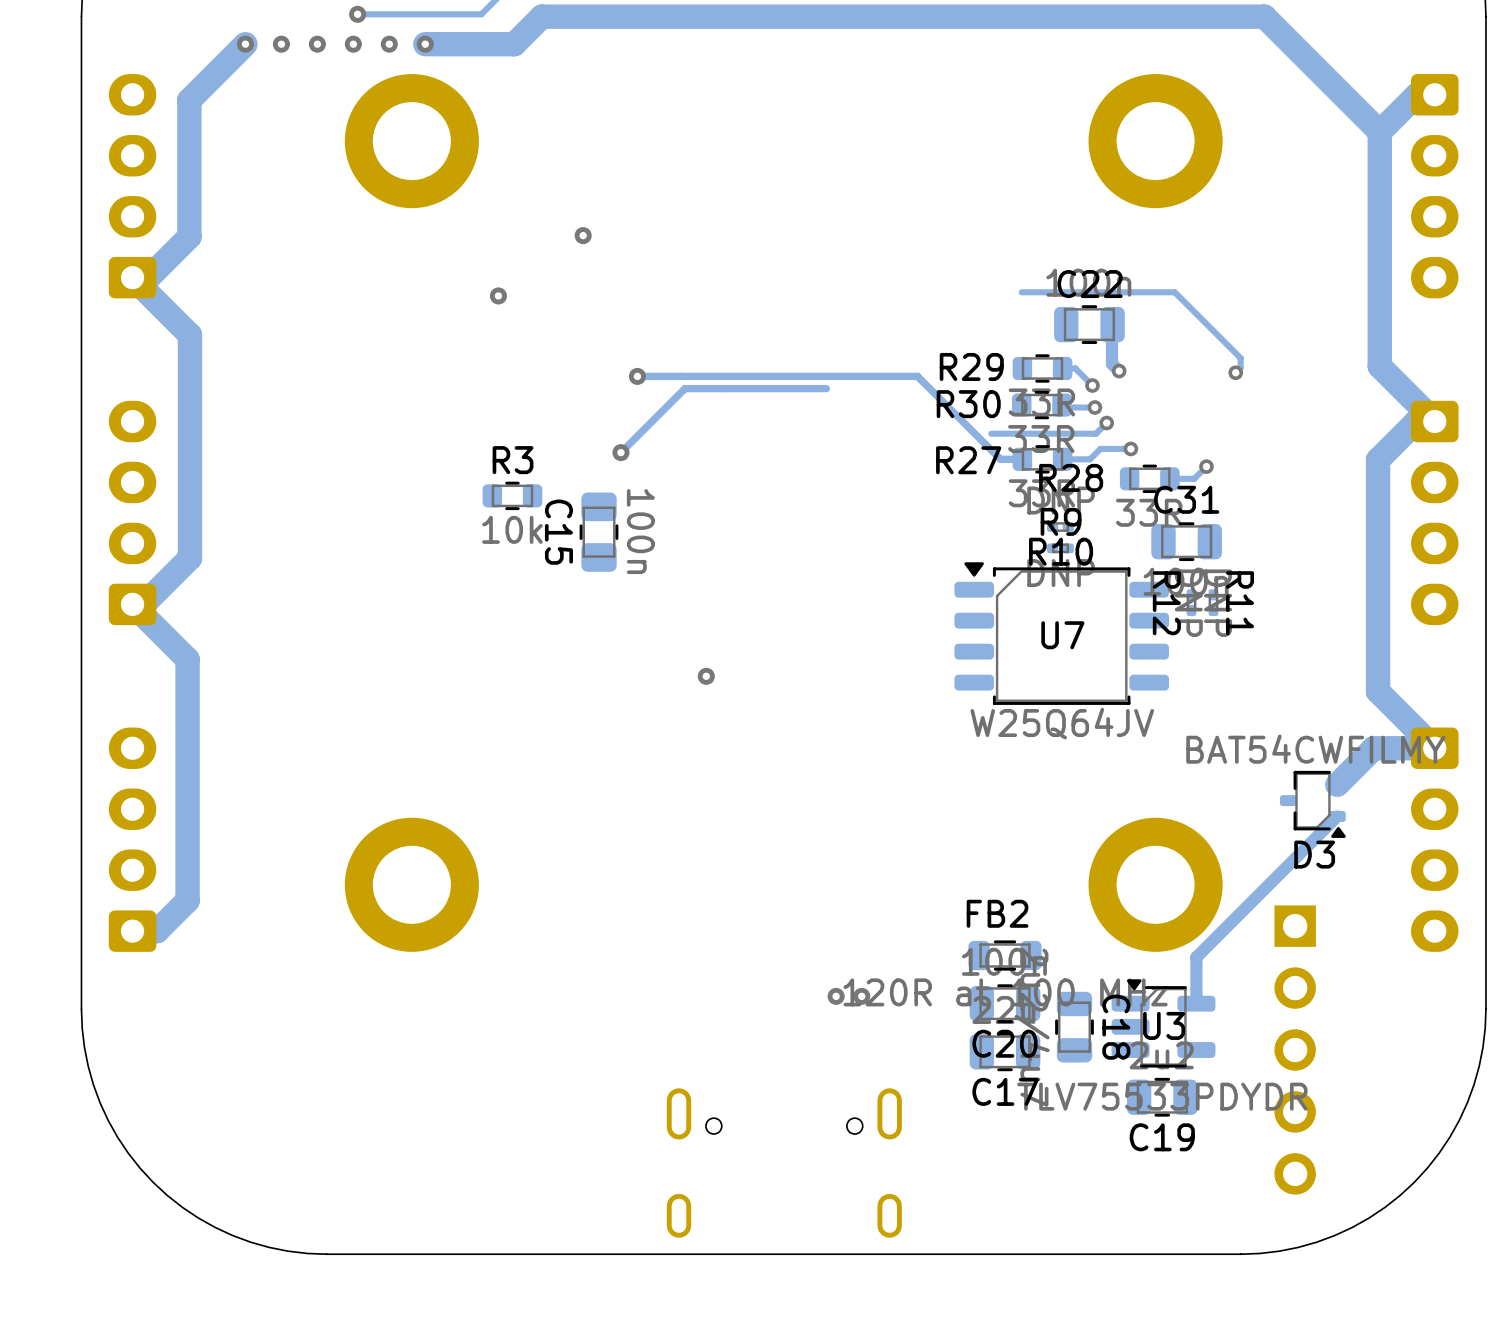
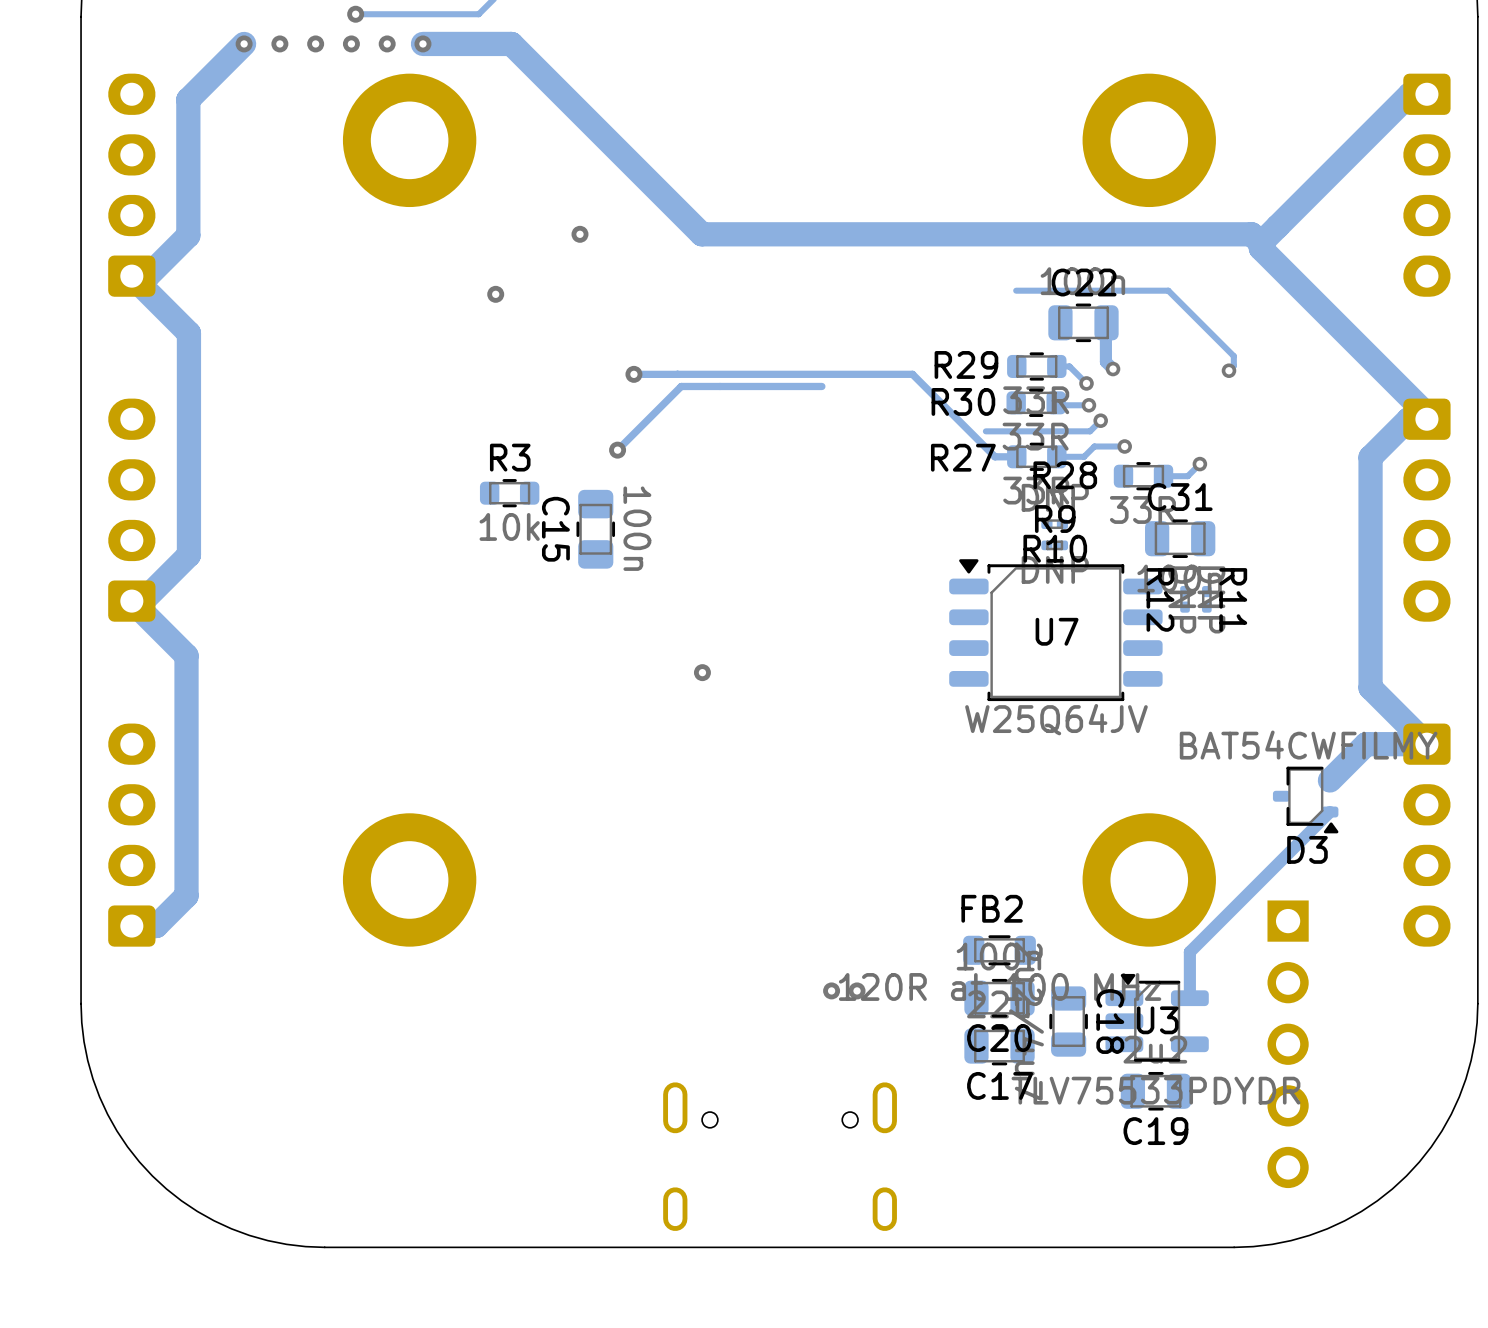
track: (514, 44) (541, 16) (1264, 16) (1379, 131) -> (511, 43) (701, 234) (1251, 234) (1260, 243)
track: (1417, 94) (1379, 131) -> (1409, 94) (1260, 243)
track: (1379, 131) (1379, 366) (1434, 421) -> (1260, 243) (1260, 248) (1426, 414) (1426, 418)

